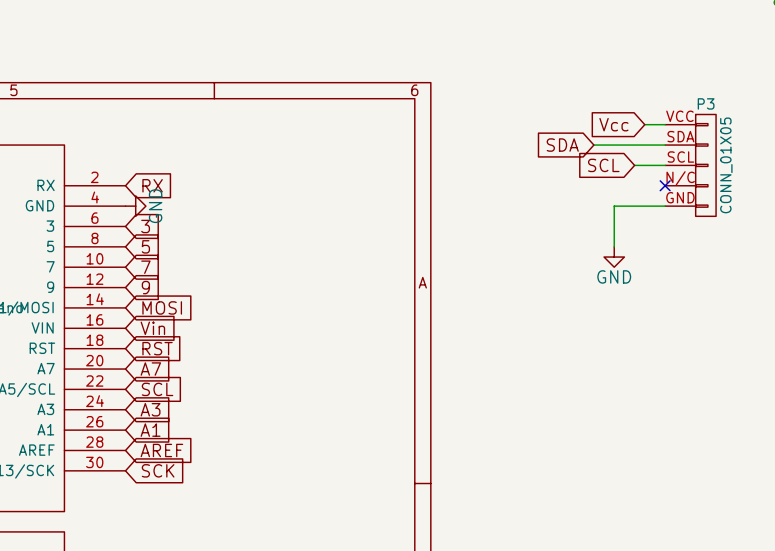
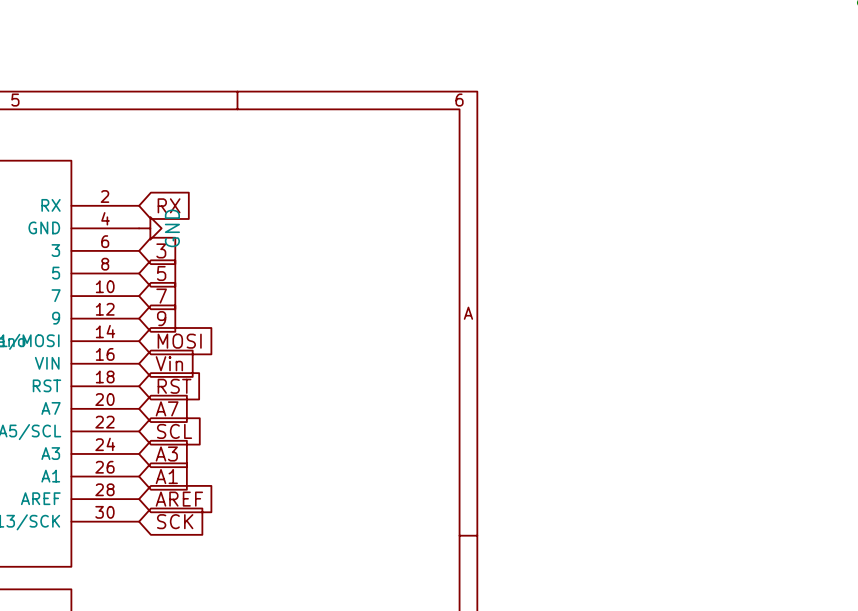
global label: Vcc (613, 124) -> none
wire: (644, 124) (665, 124) -> none
global label: SDA (562, 145) -> none
wire: (593, 145) (665, 145) -> none
global label: SCL (603, 165) -> none
wire: (634, 165) (665, 165) -> none
P3: CONN_01X05 (690, 165) -> none
no-connect mark: (665, 185) -> none
wire: (665, 206) (614, 206) (614, 246) -> none
power symbol: GND (614, 257) -> none

